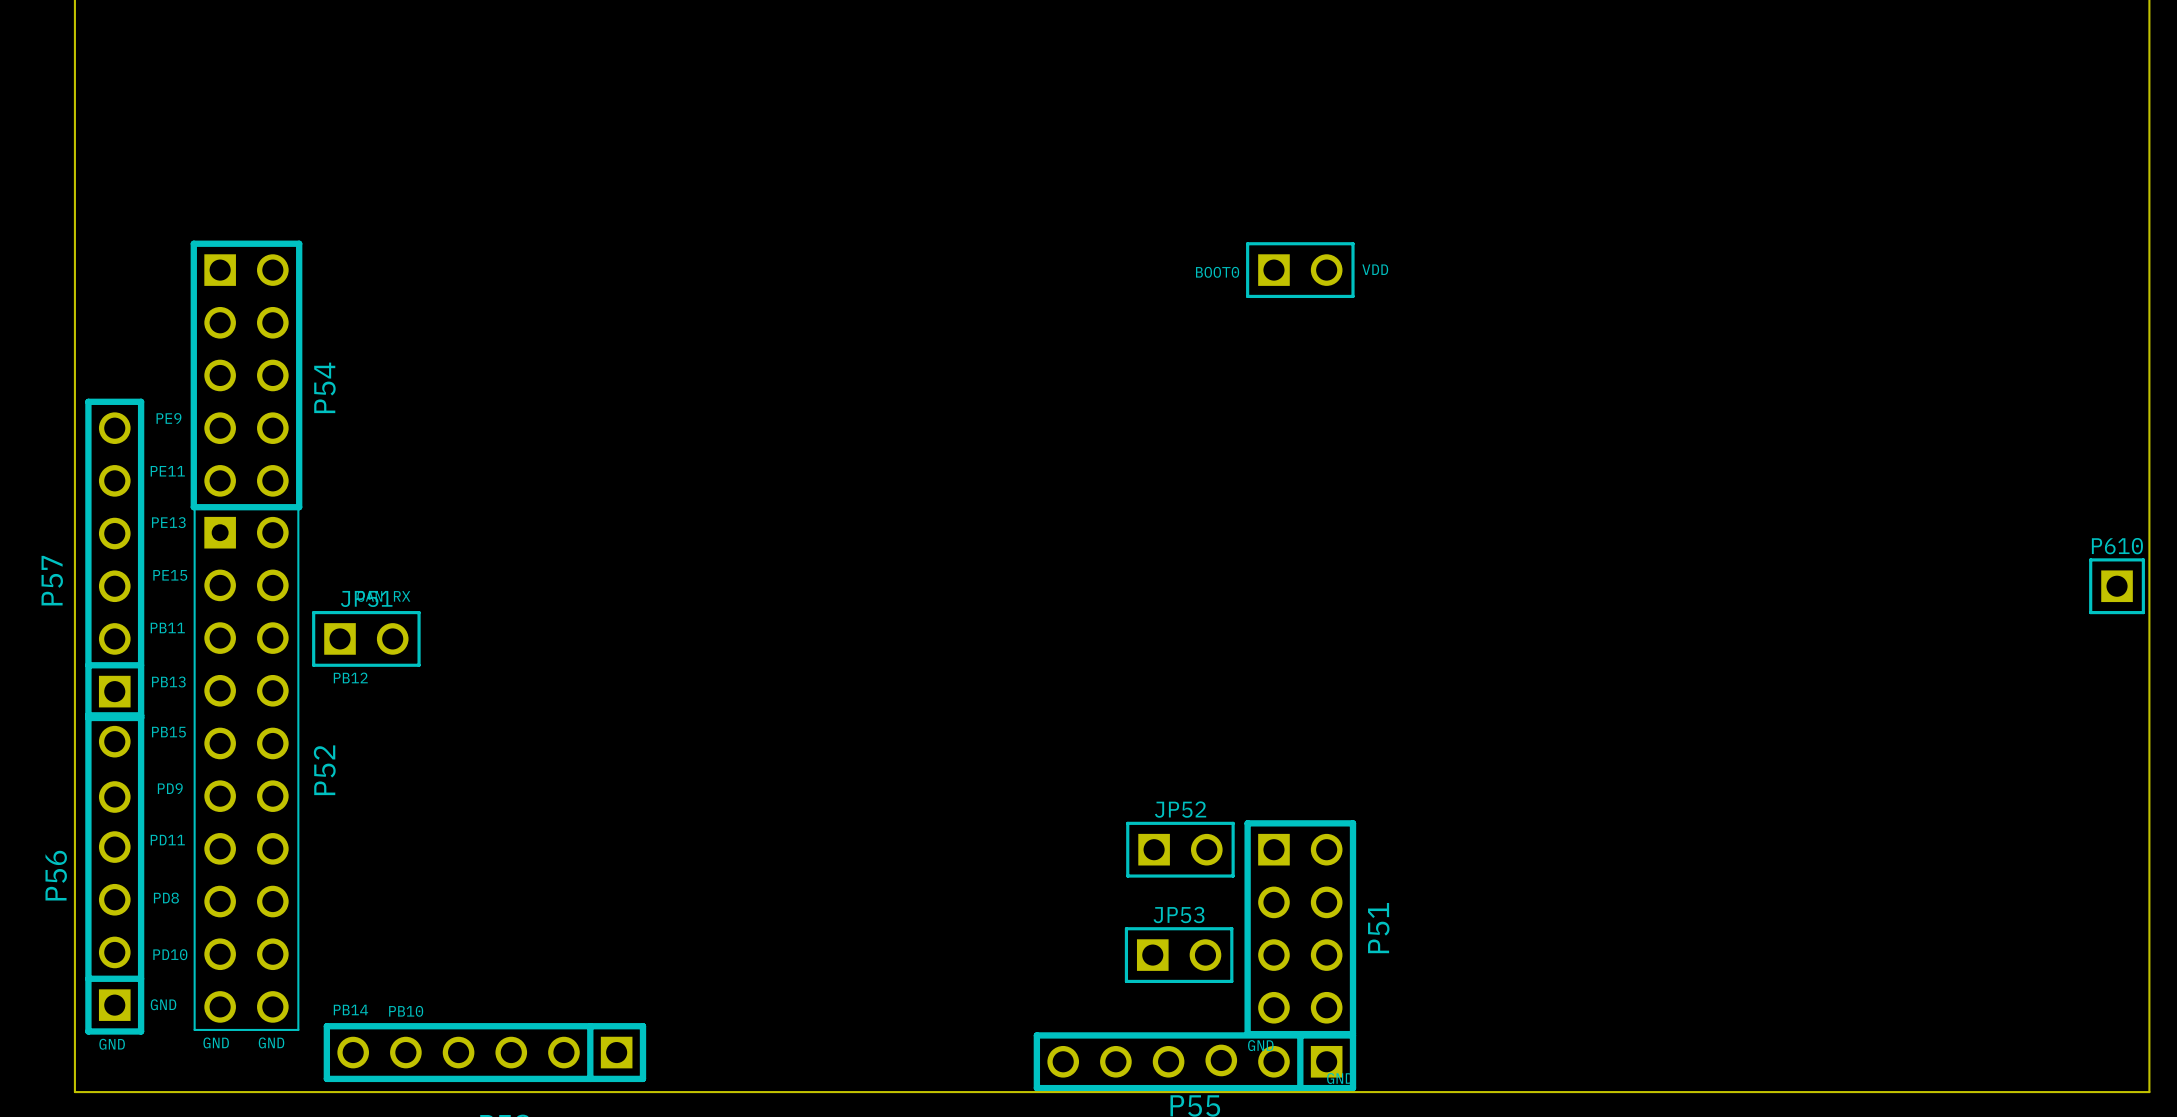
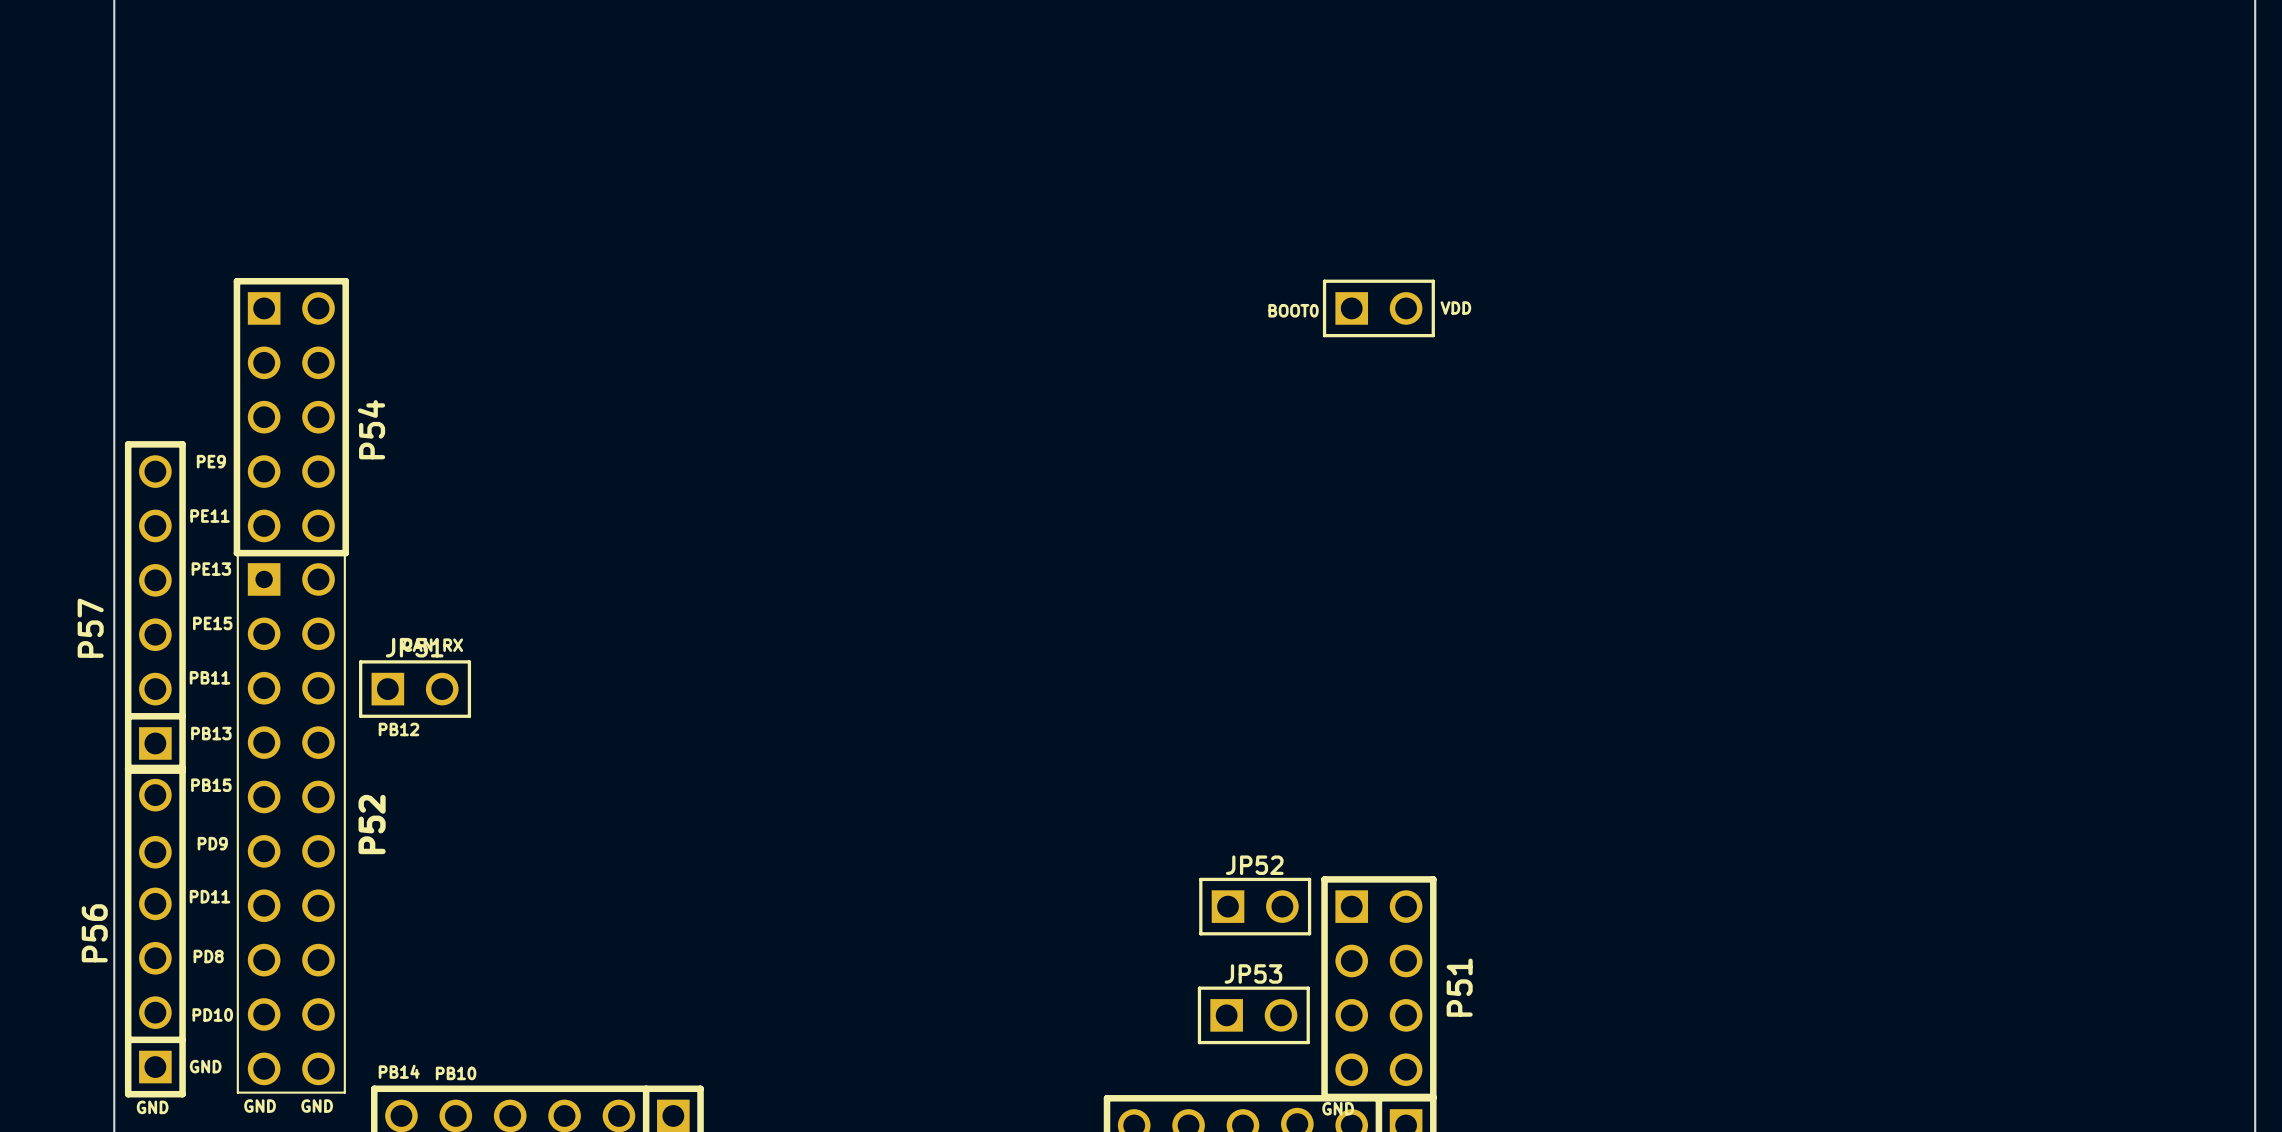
P610: (2117, 586) -> none

